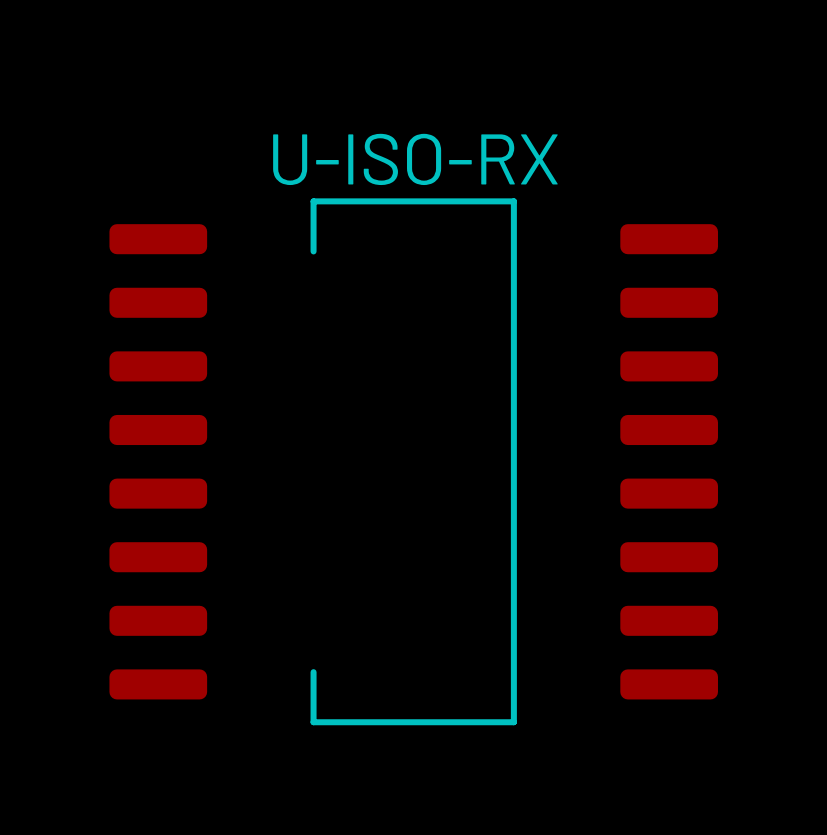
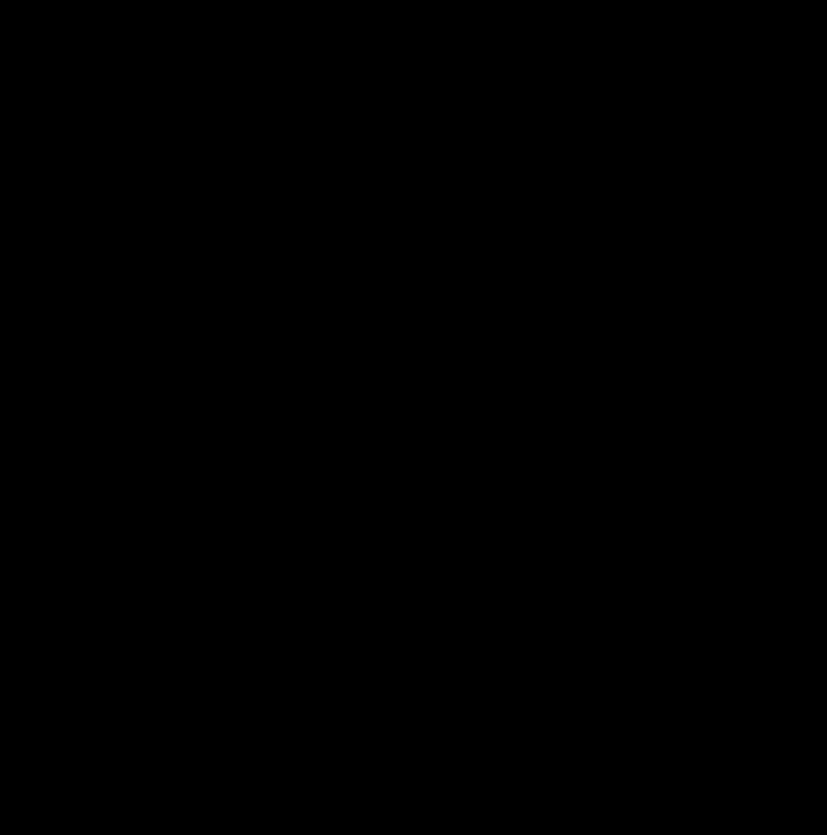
U-ISO-RX: (413, 461) -> none

